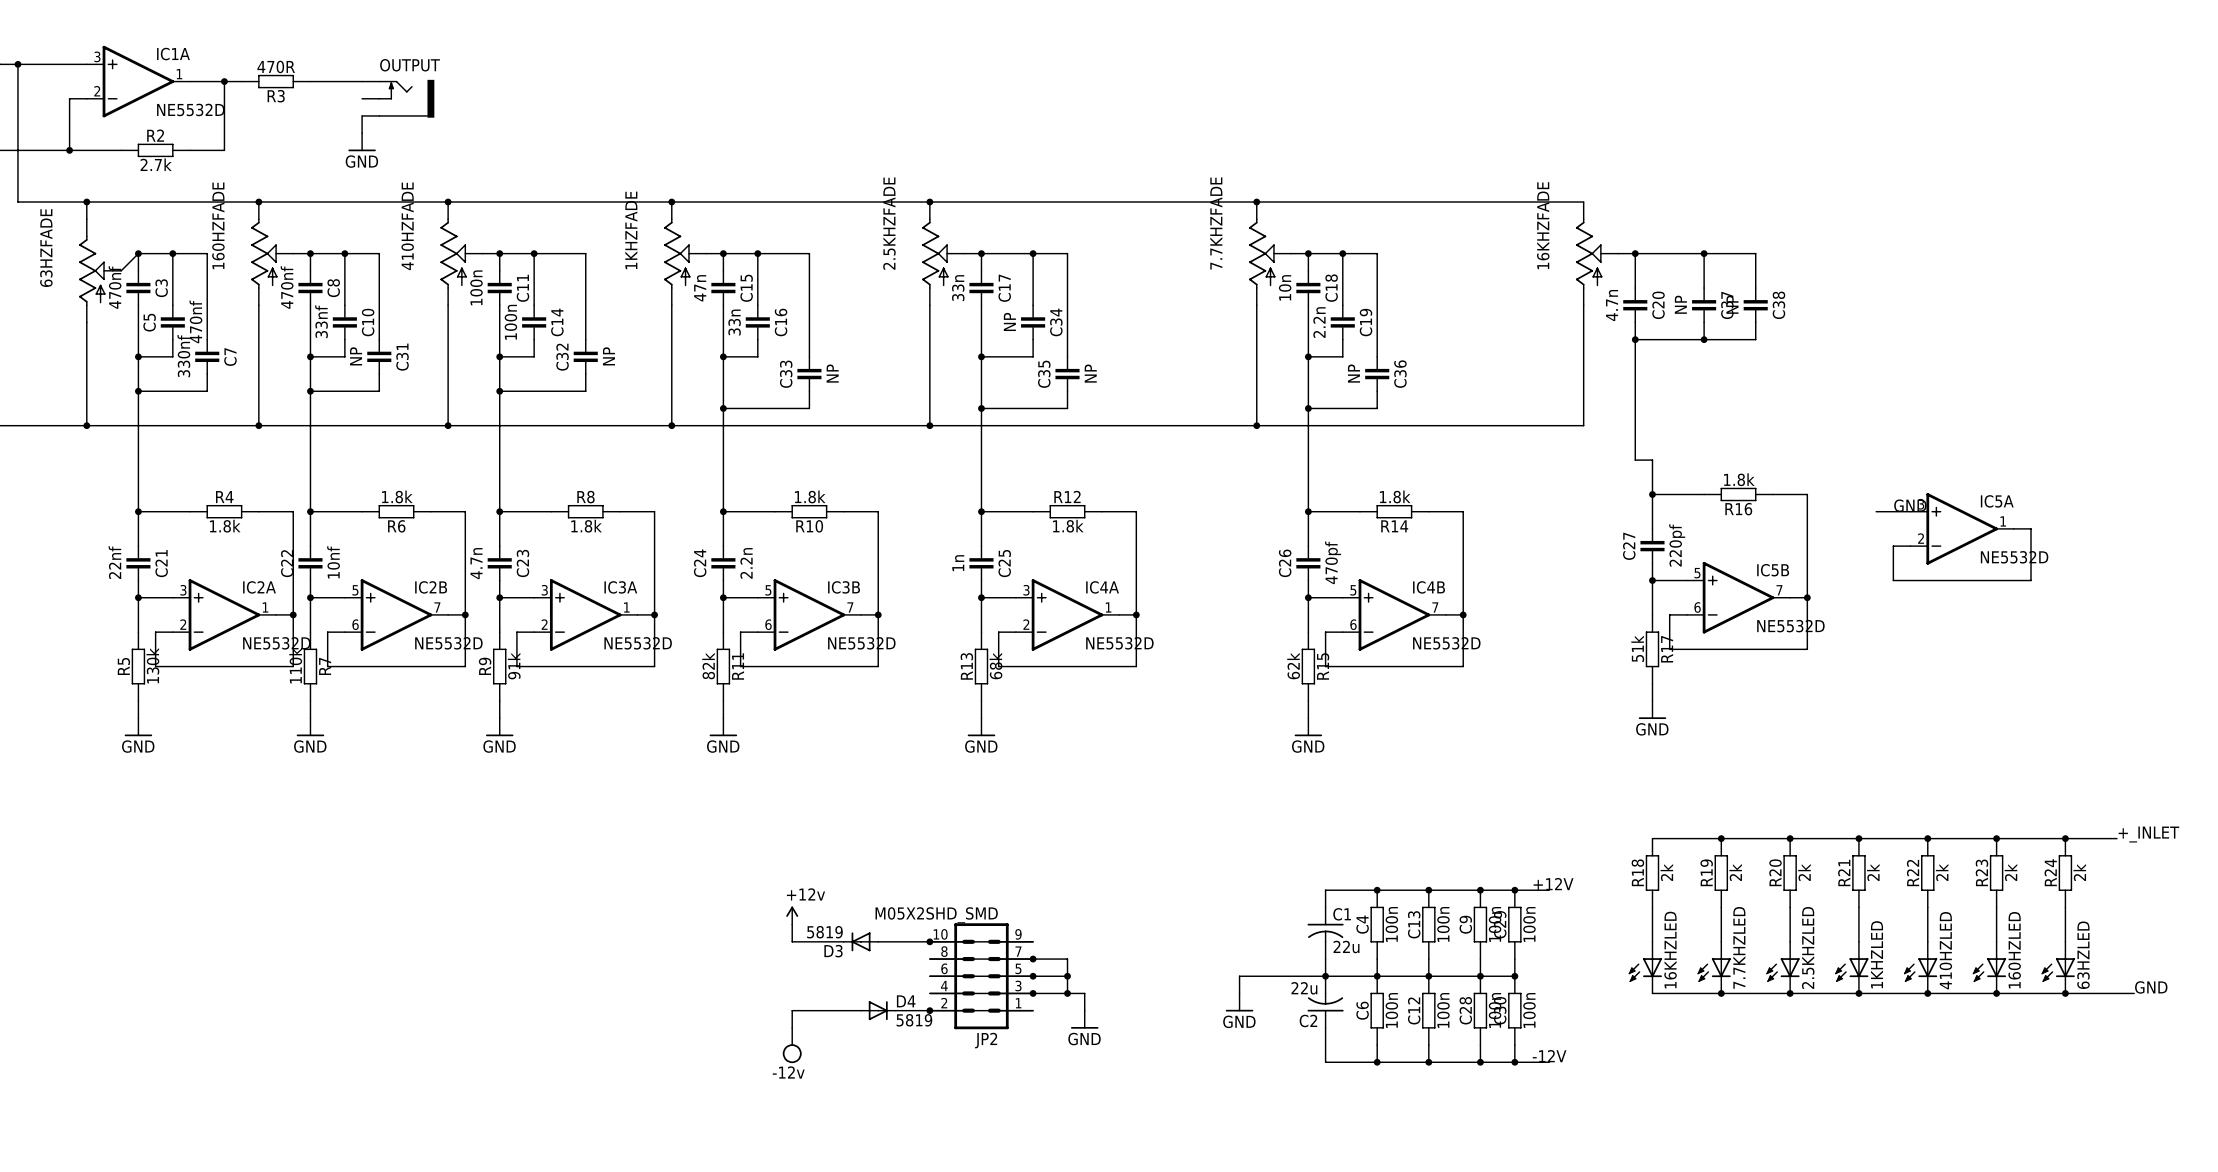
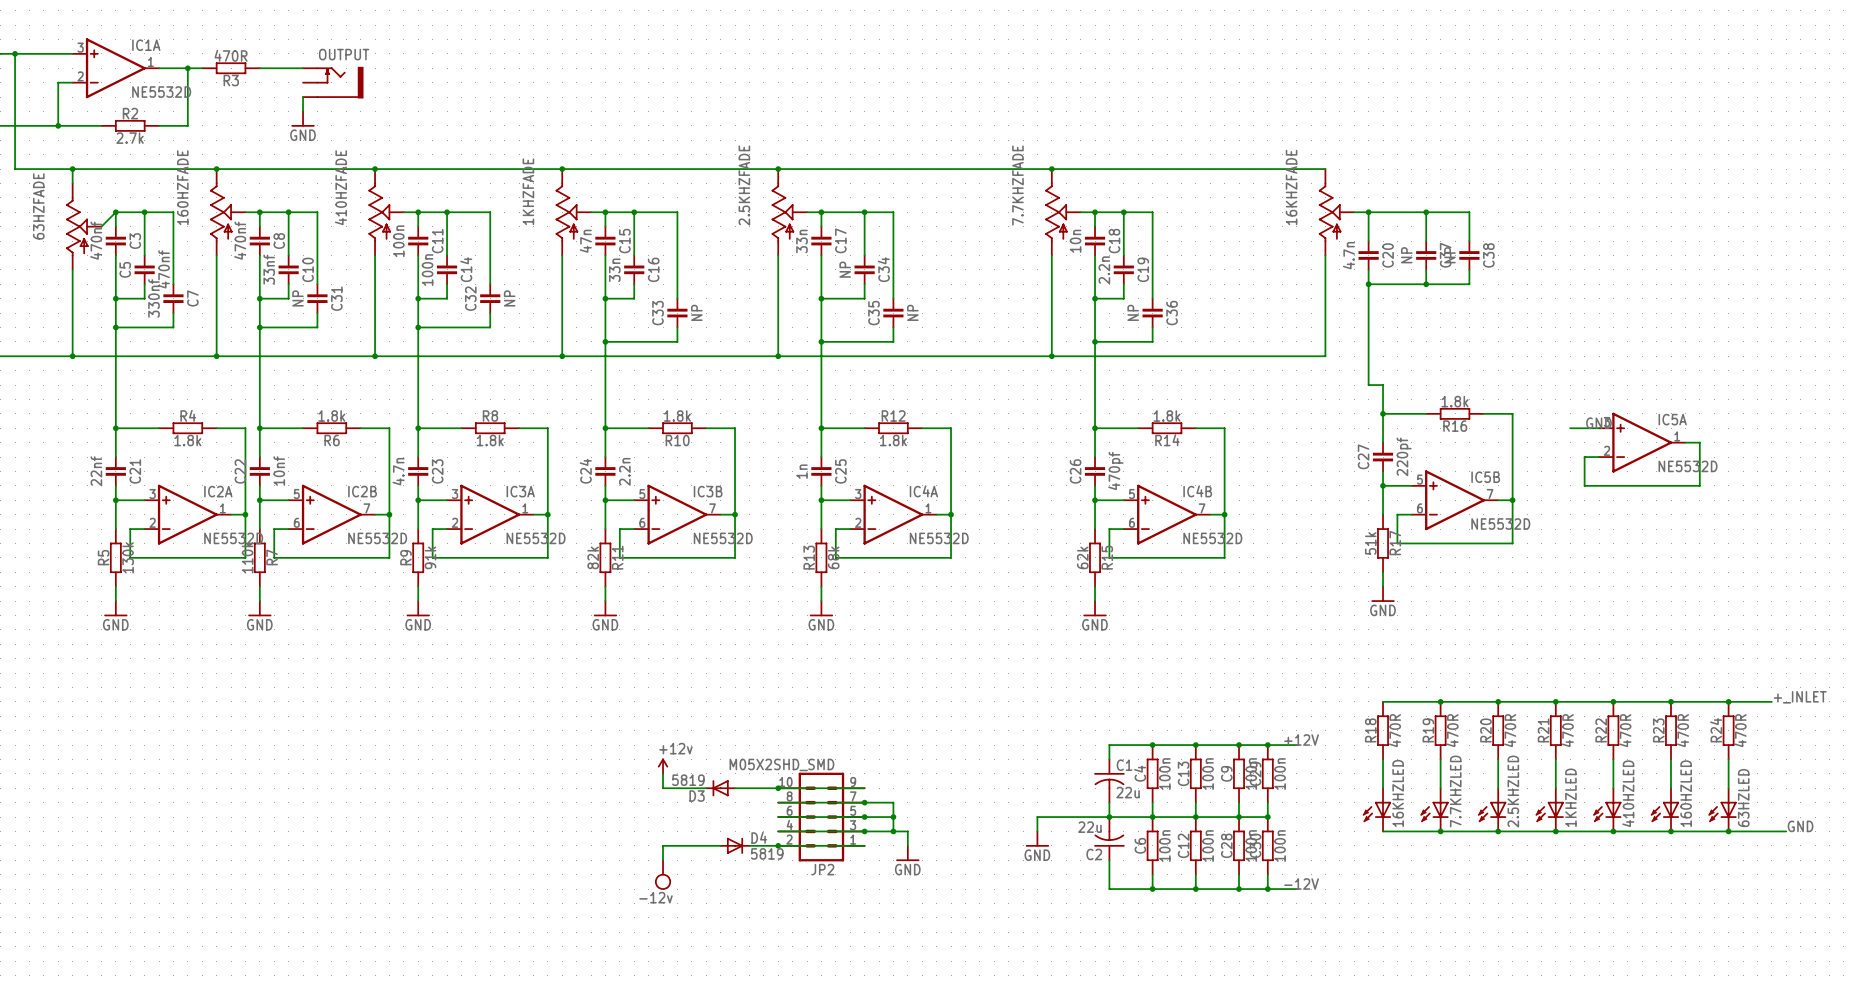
R18 value: 2k (1666, 872) -> 470R (1395, 730)
R19 value: 2k (1735, 872) -> 470R (1452, 730)
R20 value: 2k (1804, 872) -> 470R (1510, 730)
R21 value: 2k (1873, 872) -> 470R (1567, 730)
R22 value: 2k (1942, 872) -> 470R (1625, 730)
R23 value: 2k (2010, 872) -> 470R (1683, 730)
R24 value: 2k (2079, 872) -> 470R (1740, 730)

